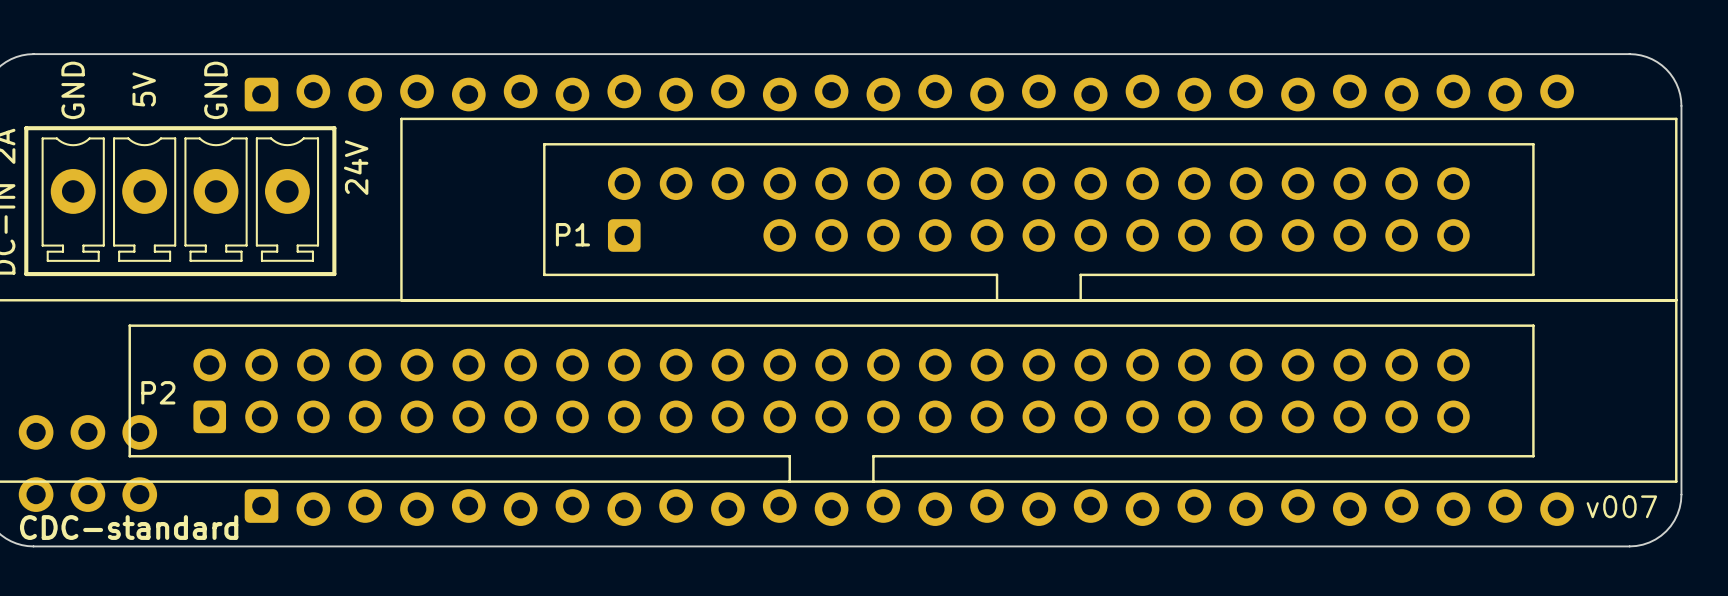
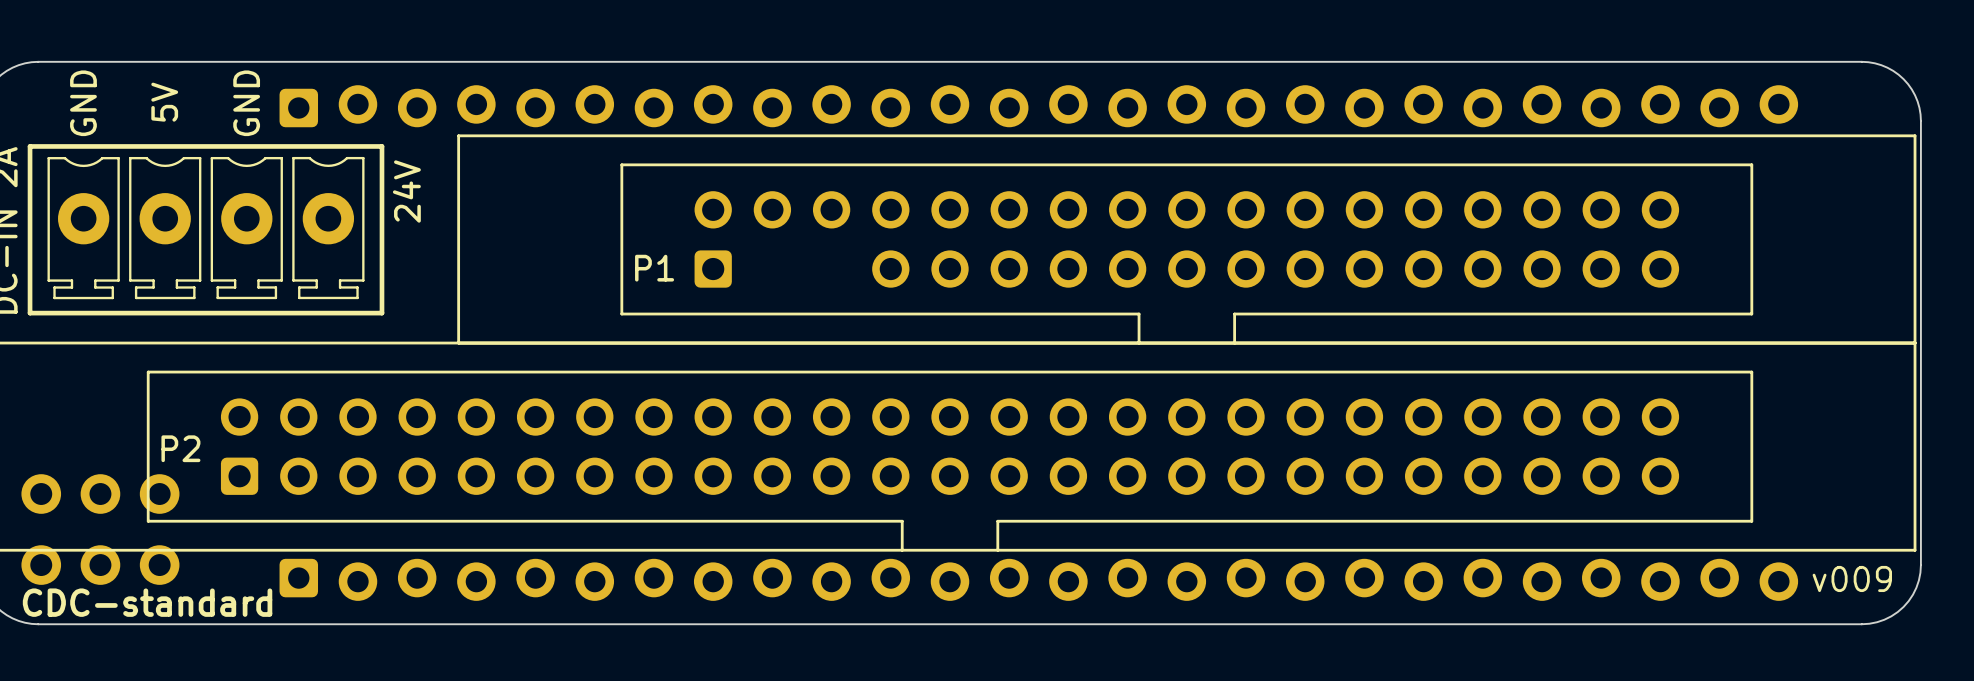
text: v007 (1621, 506) -> v009 (1852, 578)

